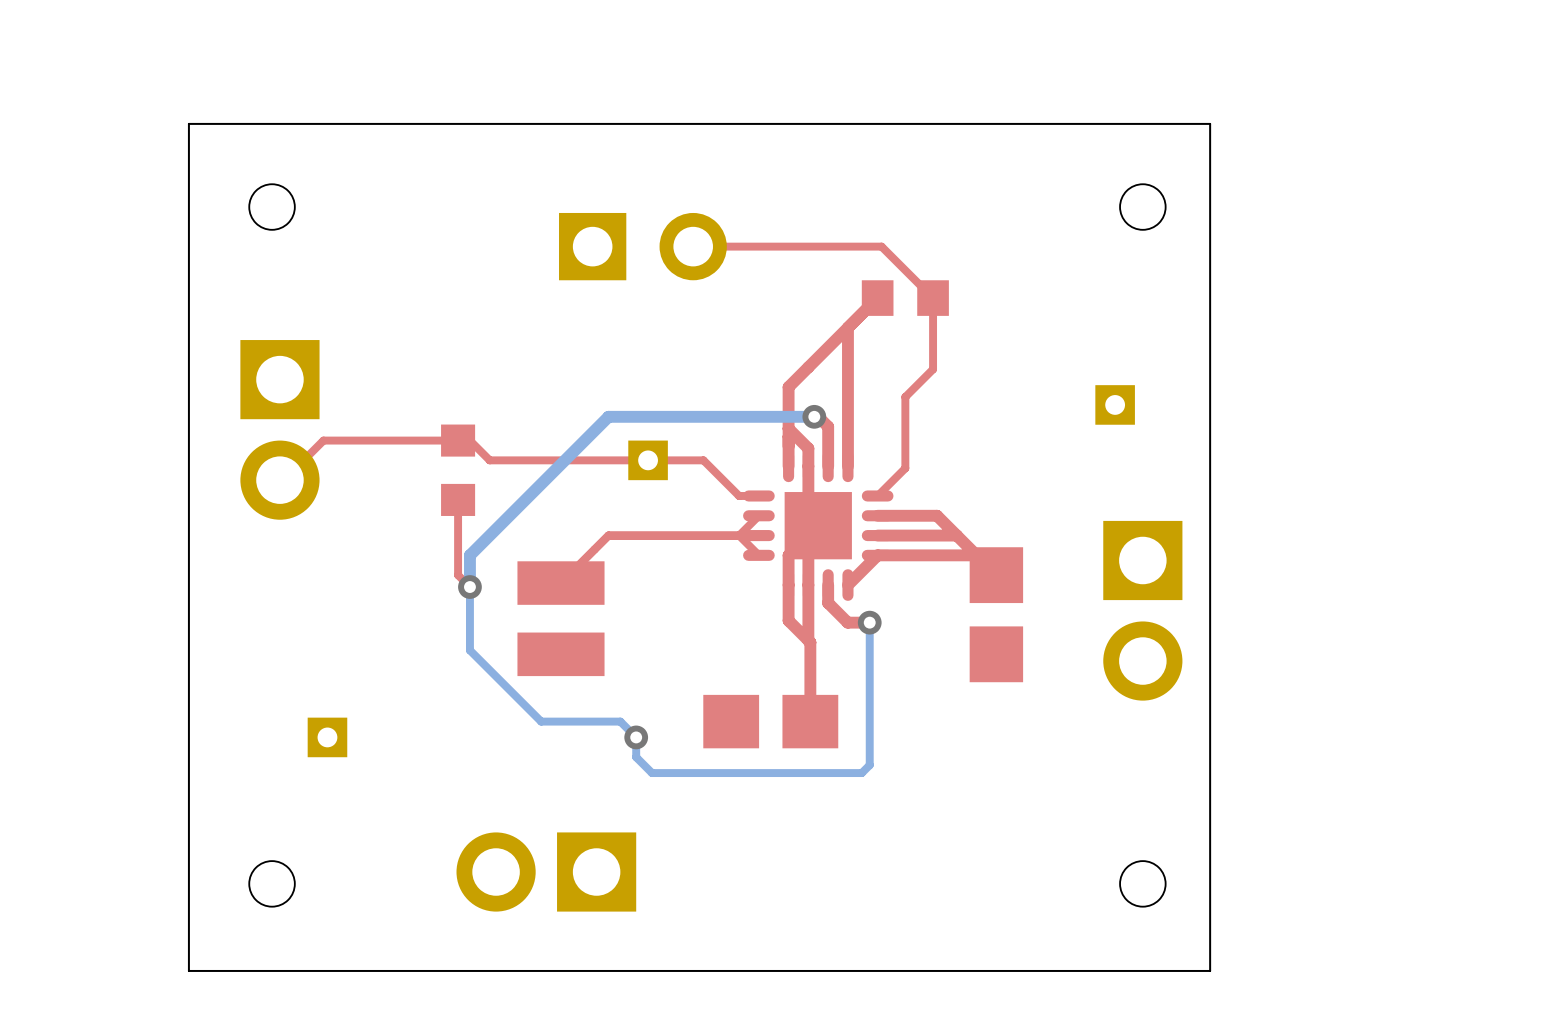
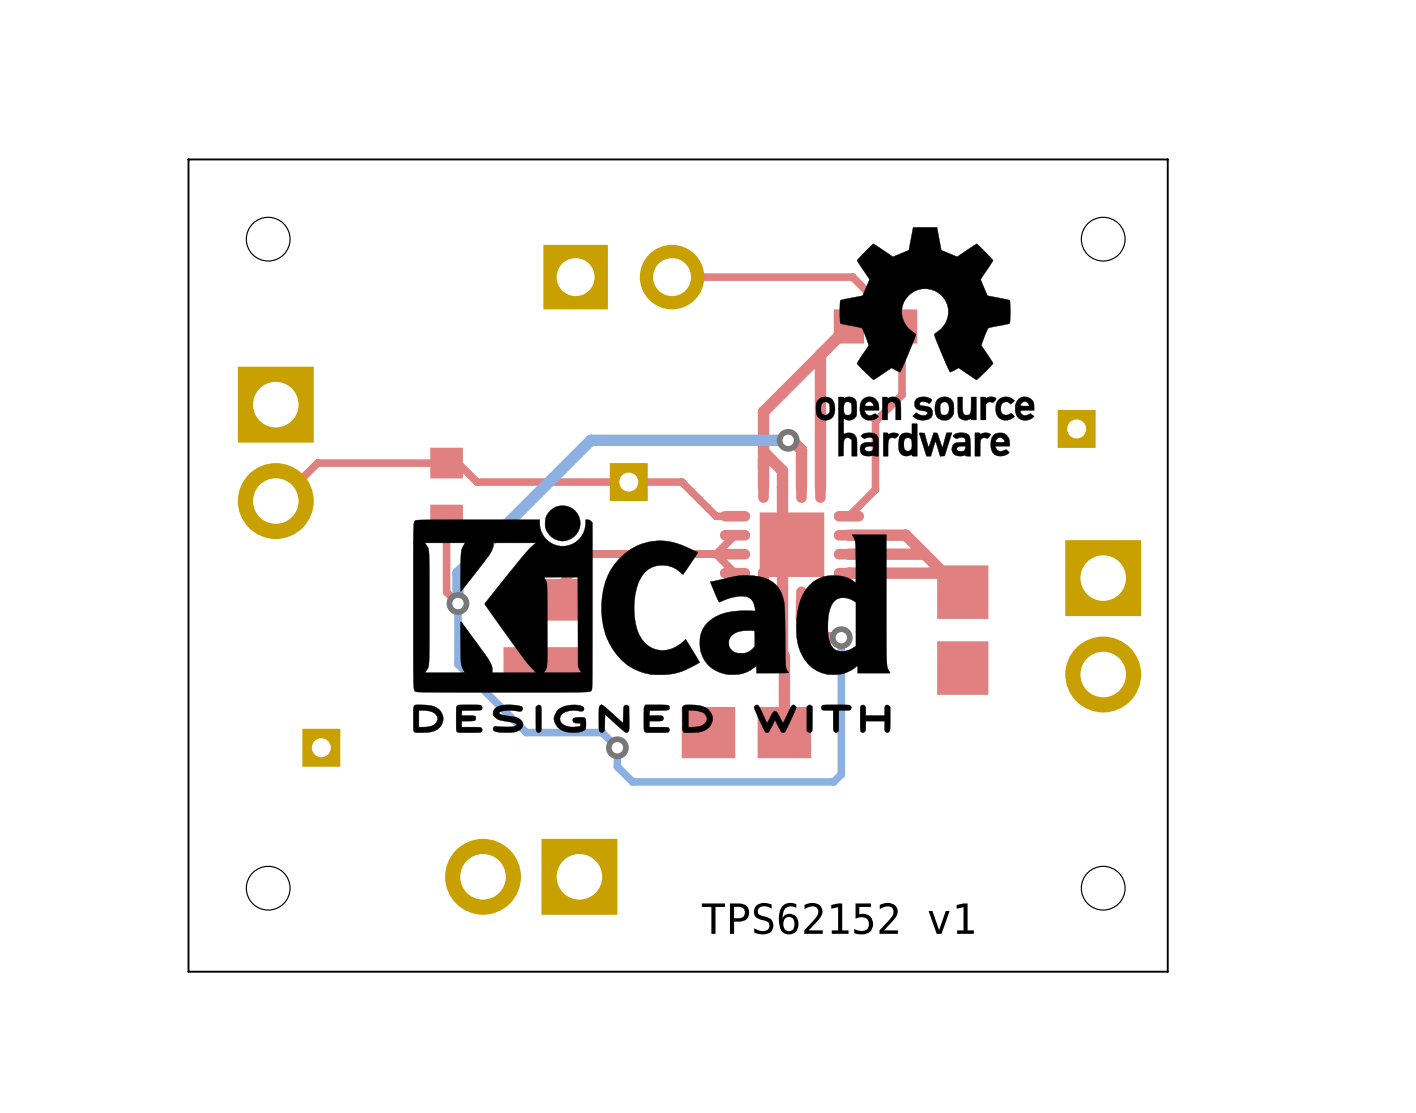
drawing: none -> [815, 227, 1035, 457]
drawing: none -> [413, 505, 891, 733]
text: none -> TPS62152 v1 (837, 918)

